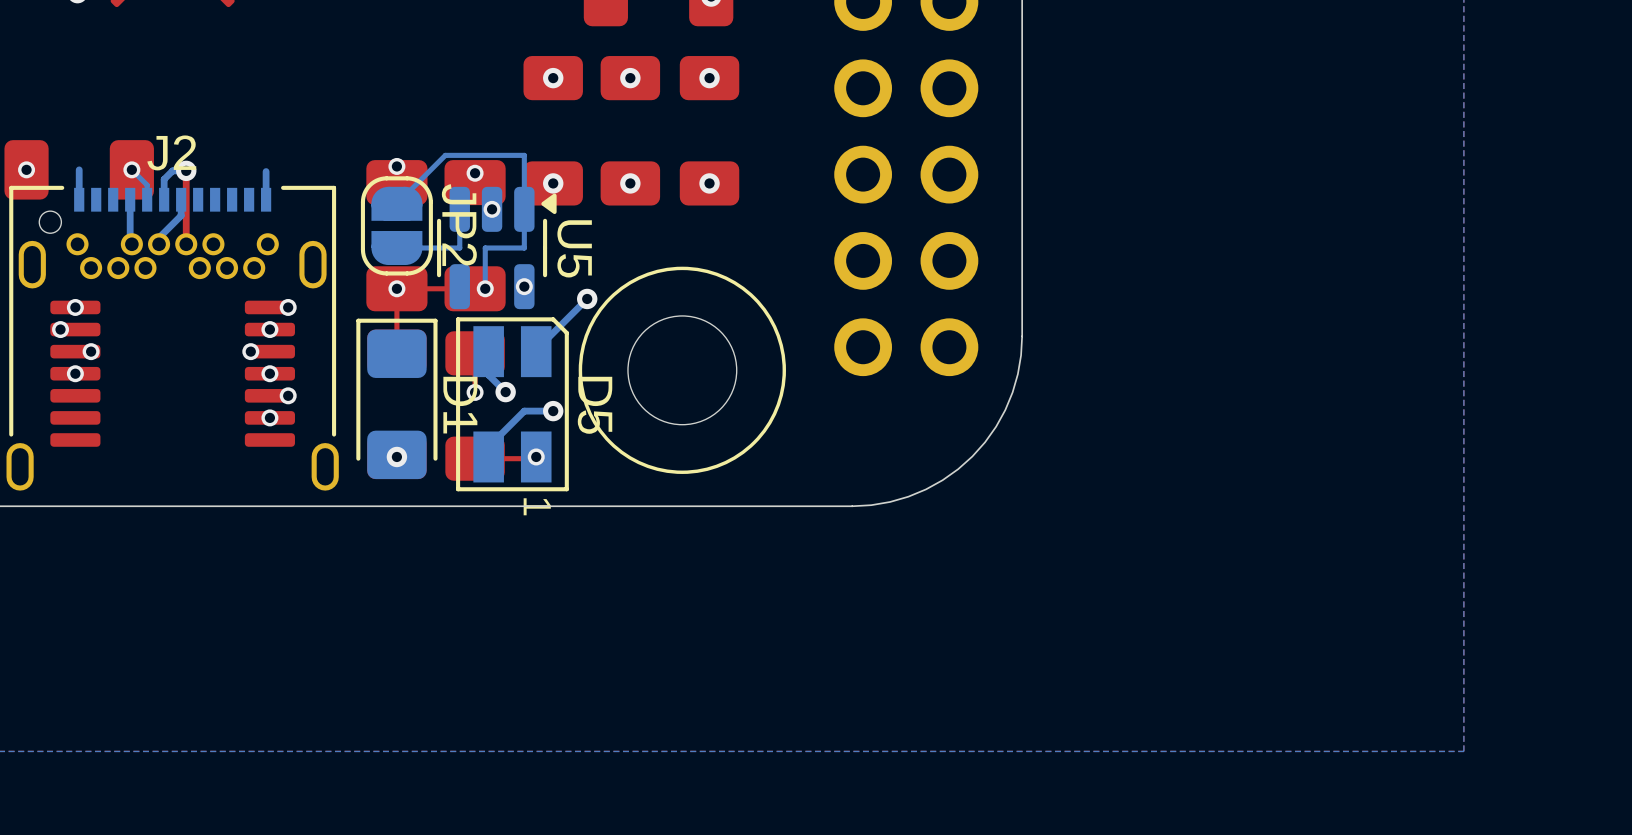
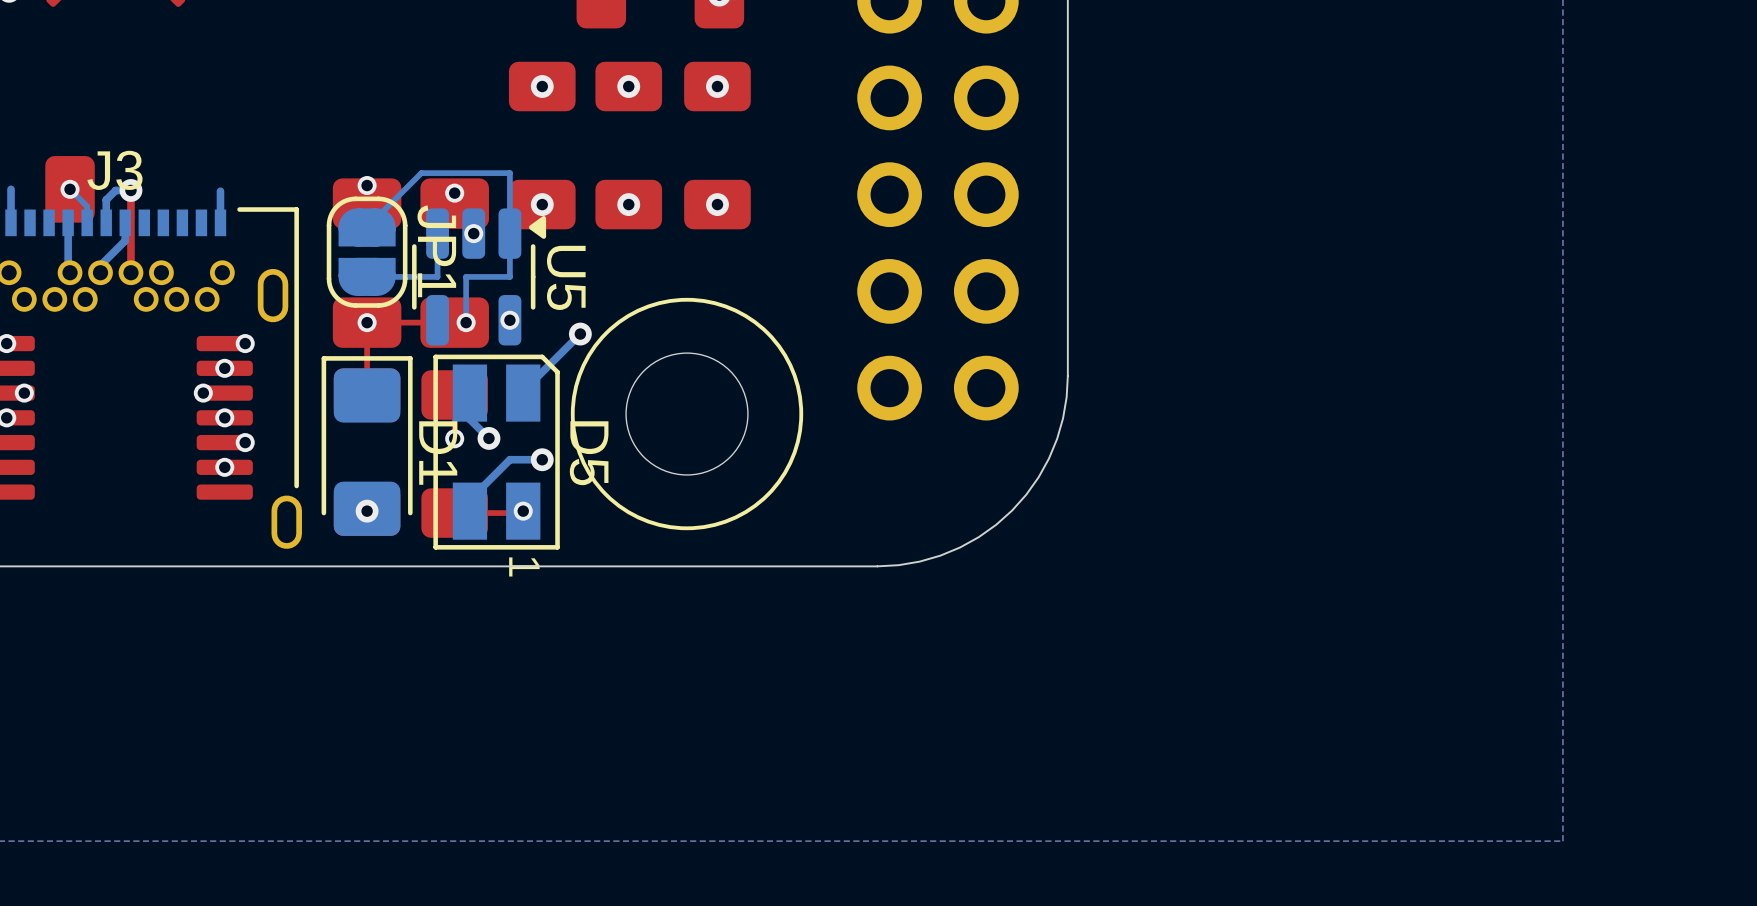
J2 name: J2 (171, 152) -> J3 (114, 170)
JP2 name: JP2 (459, 225) -> JP1 (436, 251)

